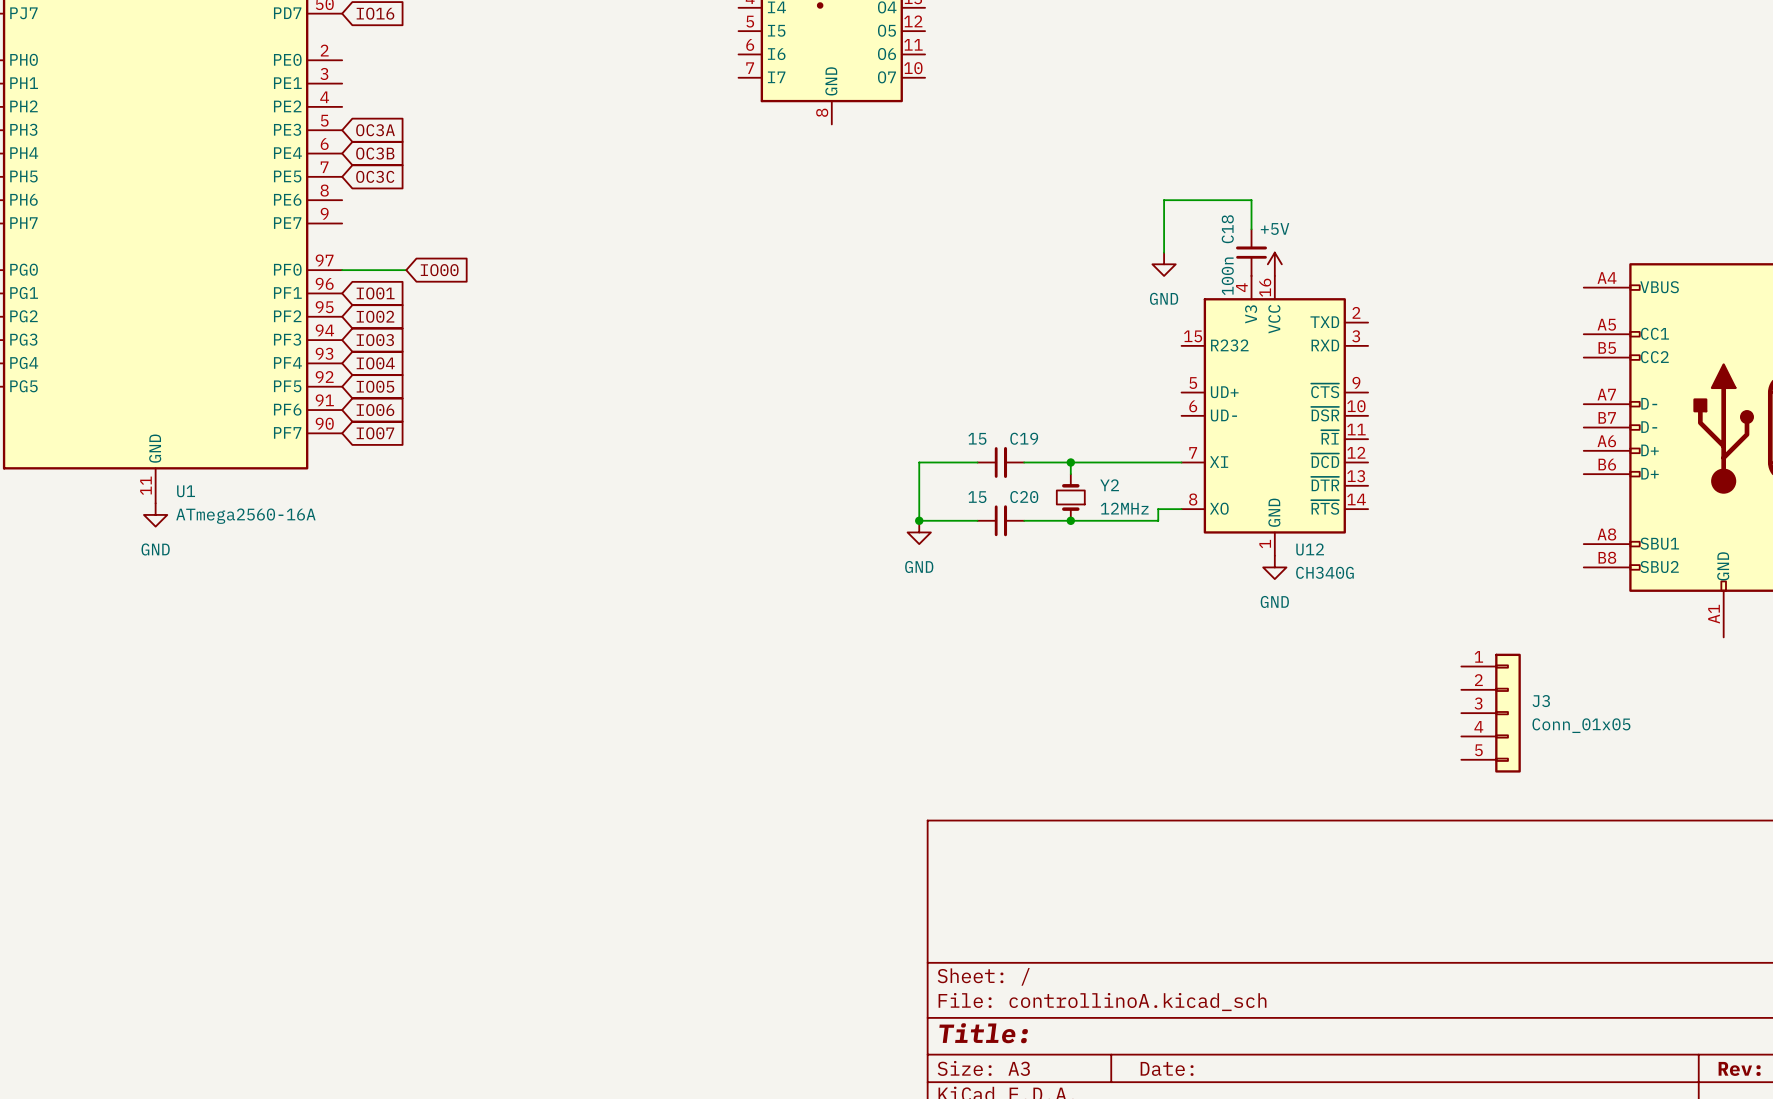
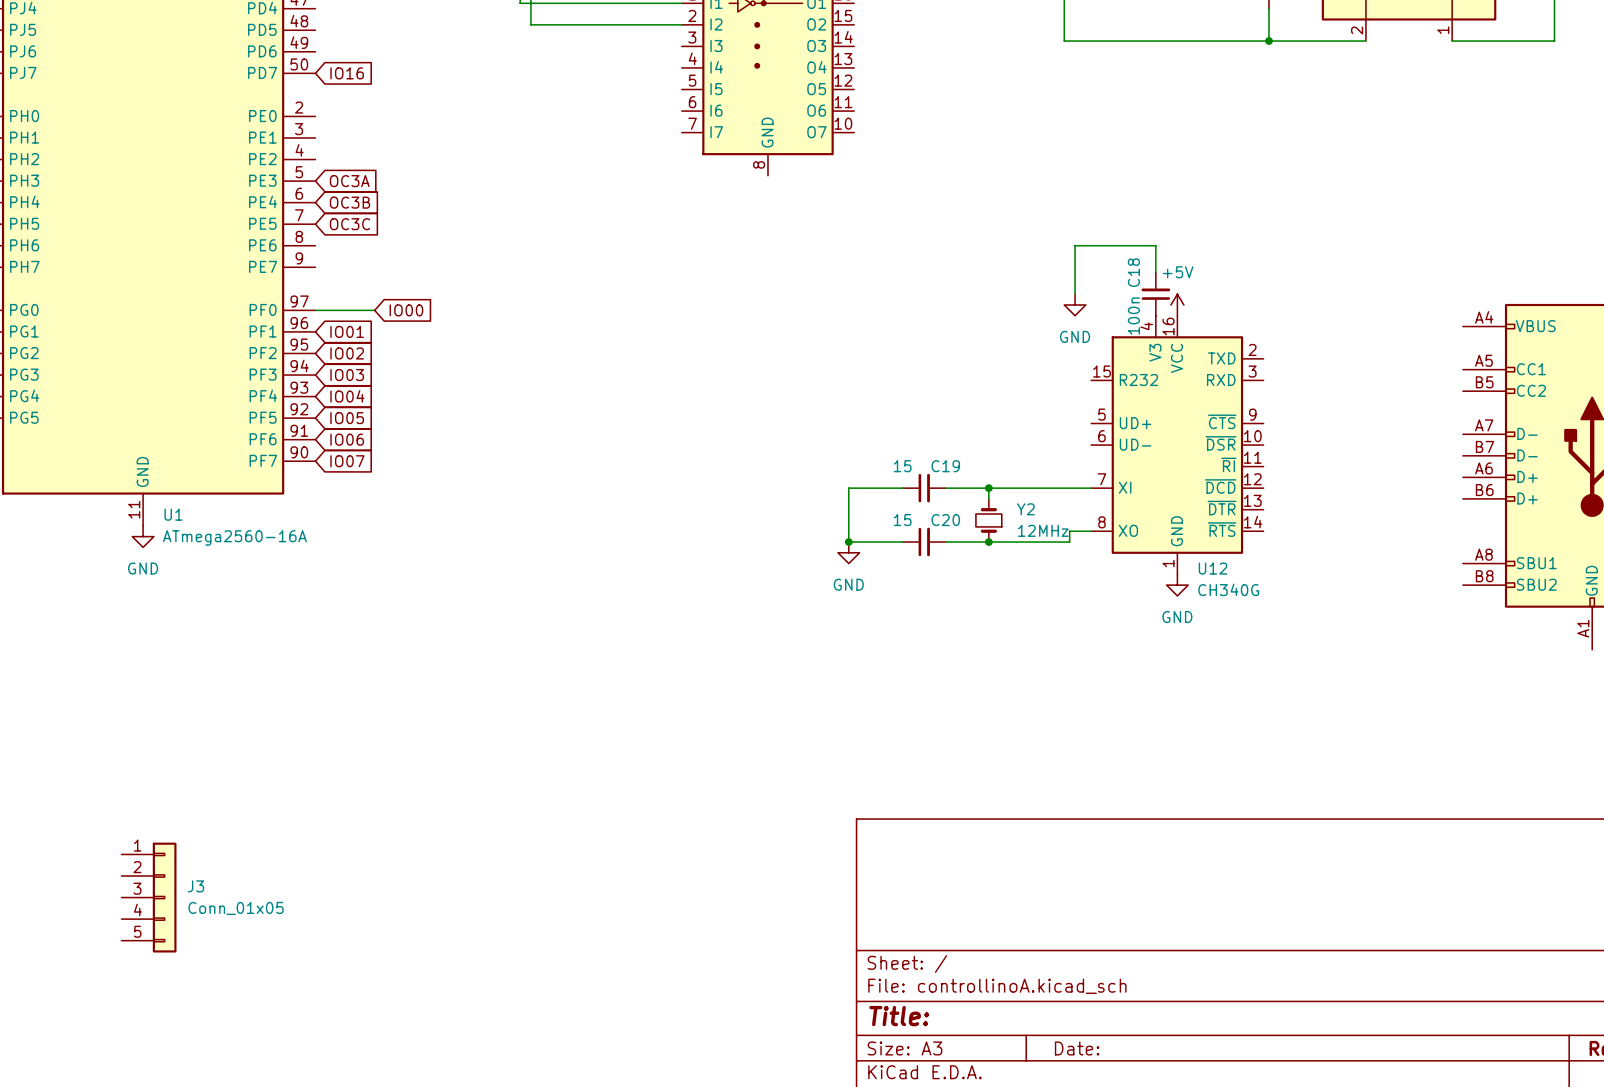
J3 position: (1491, 713) -> (149, 897)

